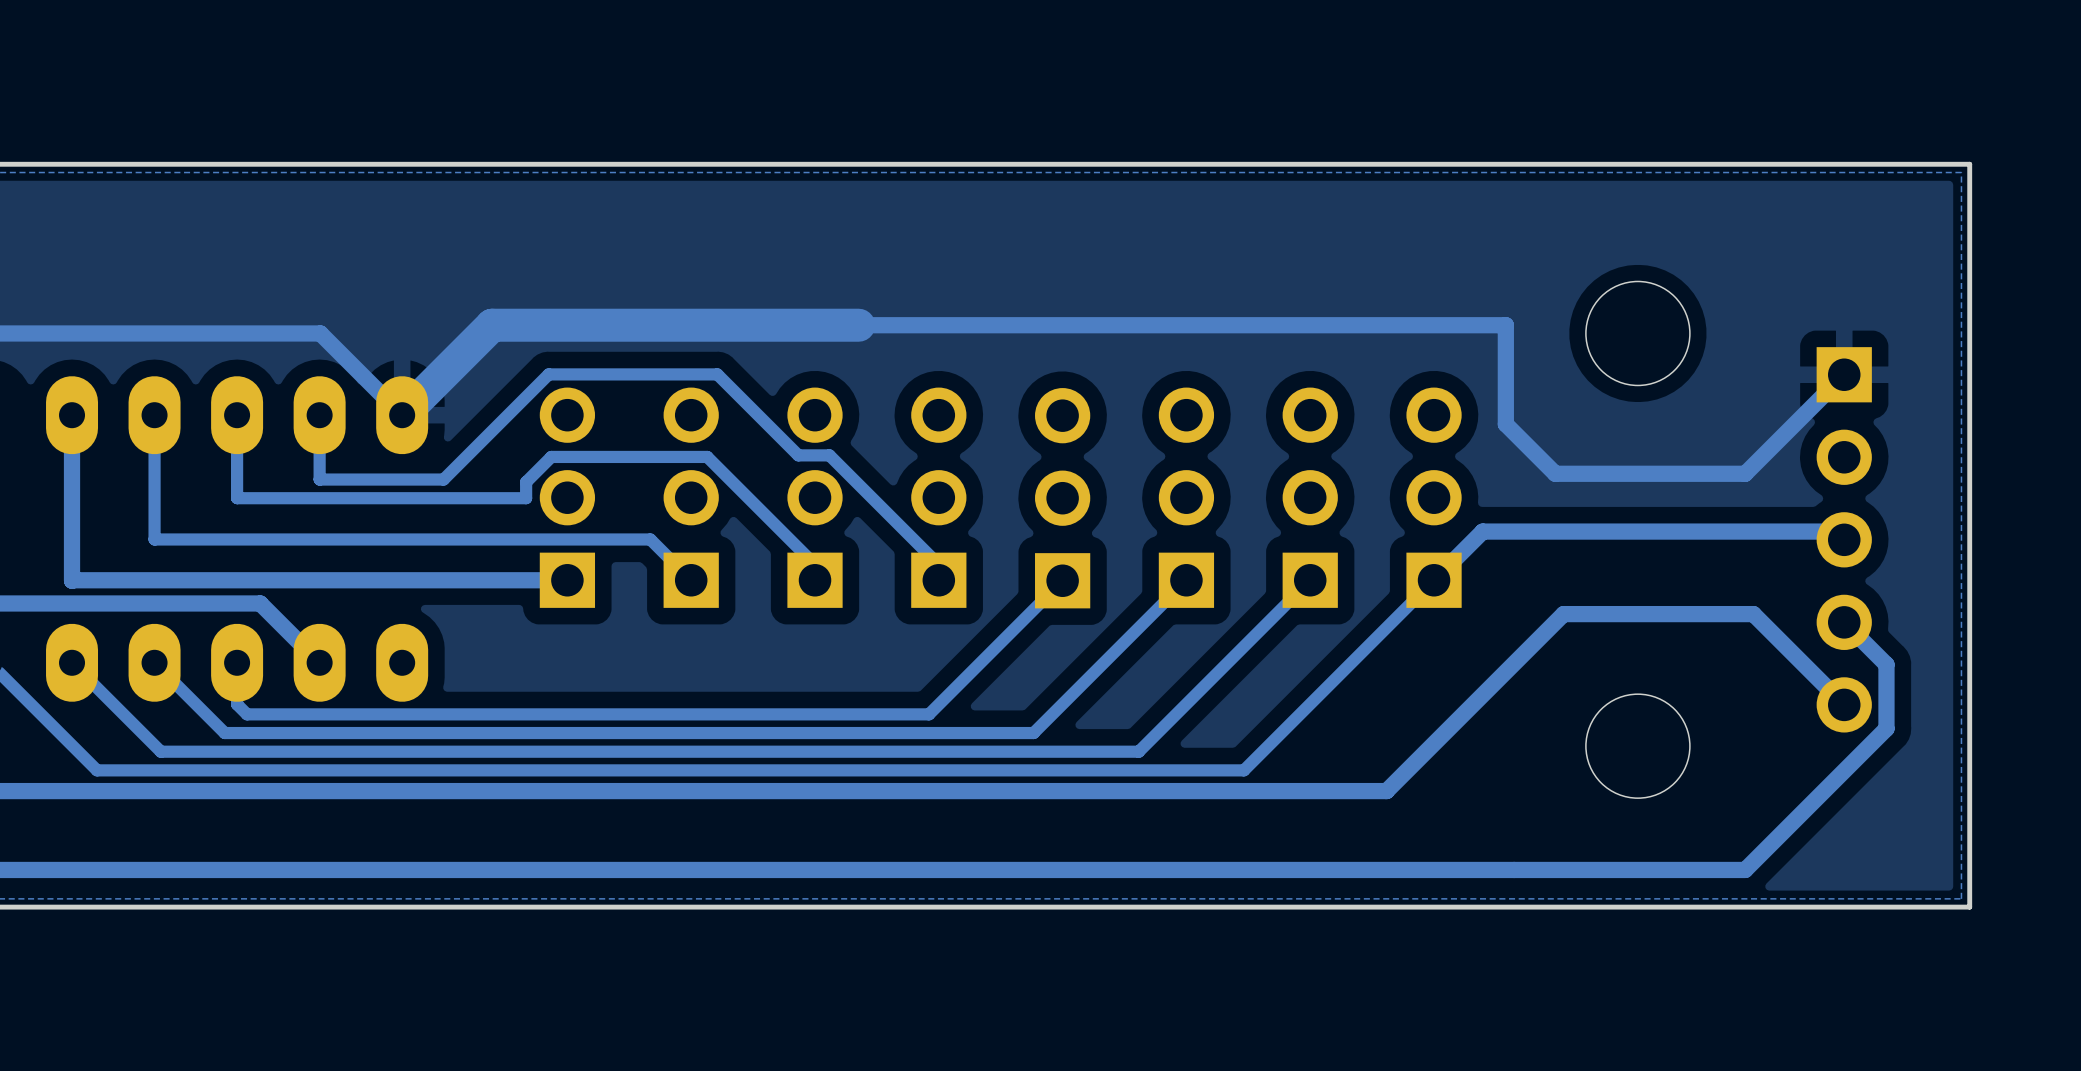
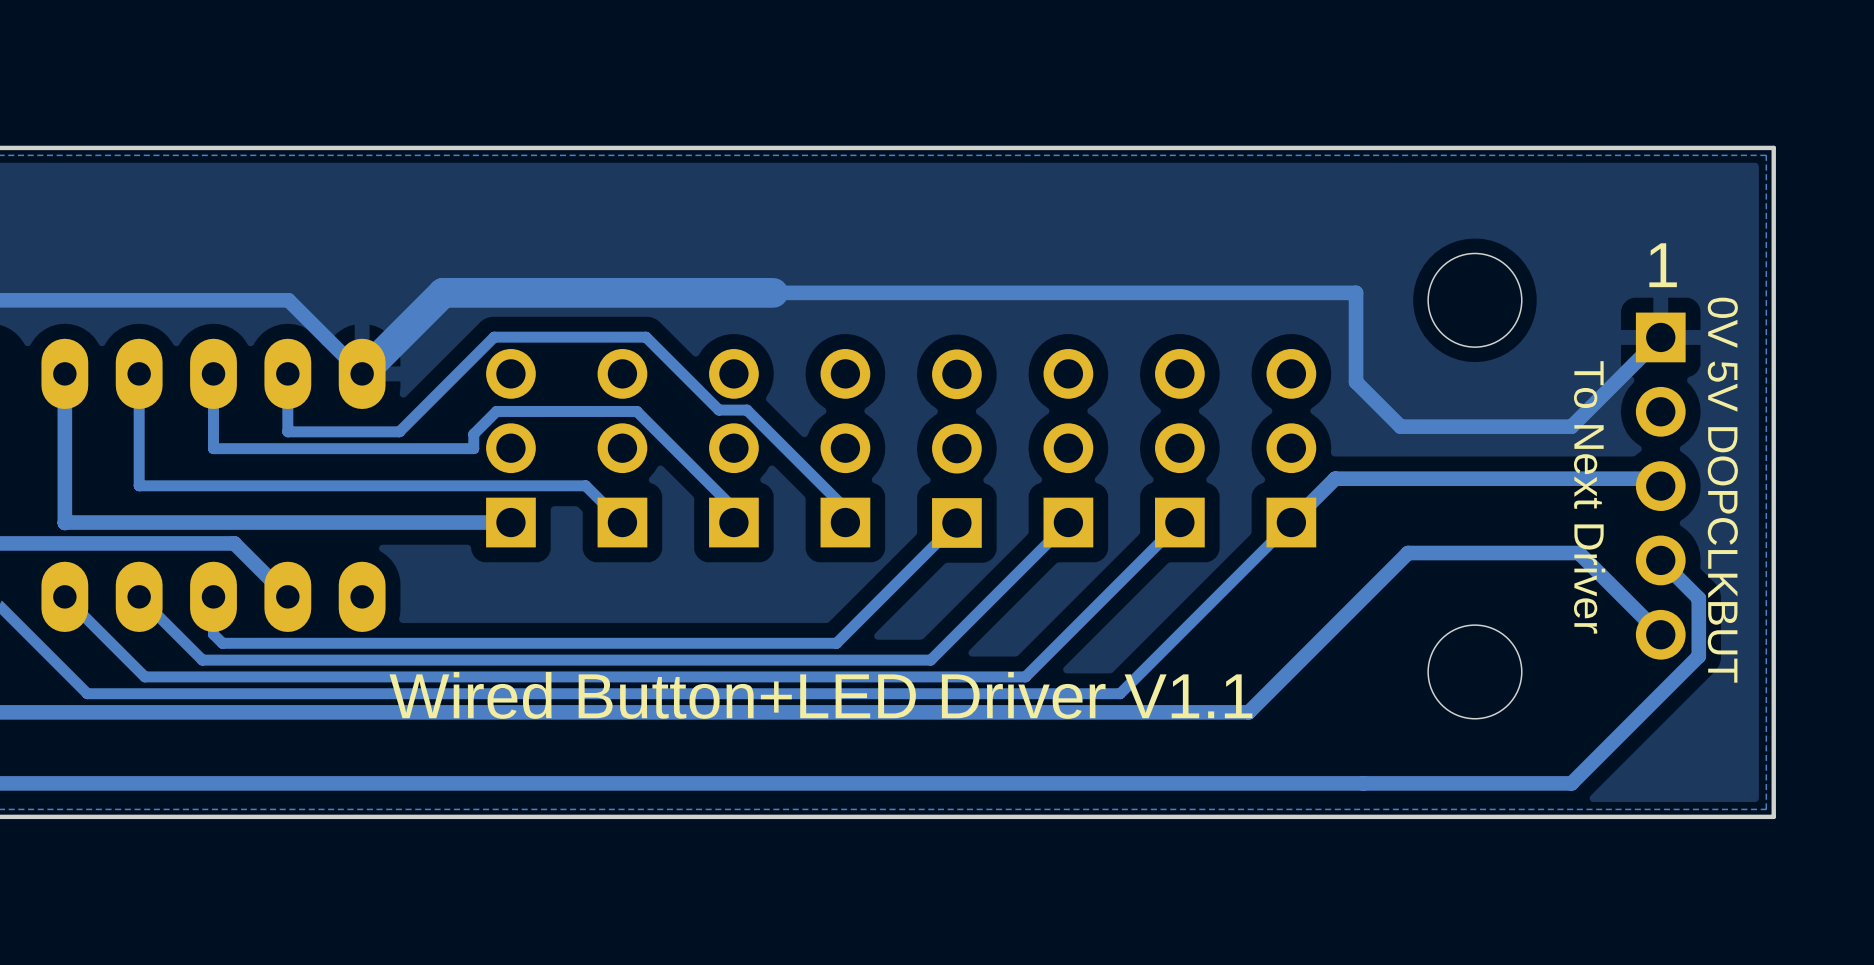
text: none -> 1 (1663, 265)
text: none -> 0V 5V DOPCLKBUT (1722, 490)
text: none -> To Next Driver (1589, 497)
text: none -> Wired Button+LED Driver V1.1 (820, 695)

